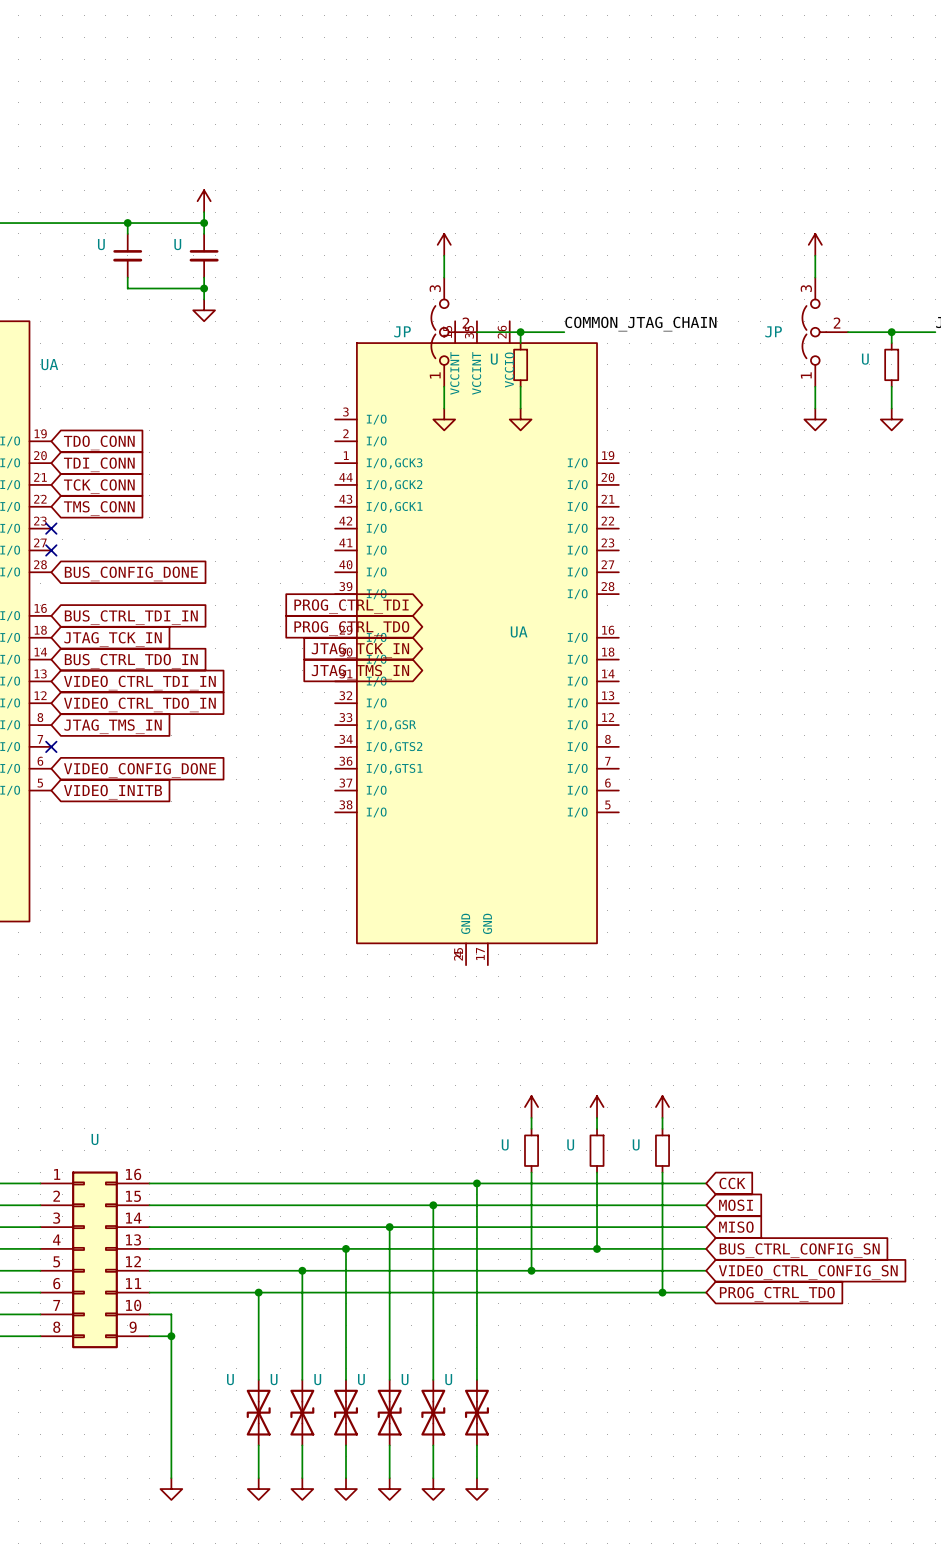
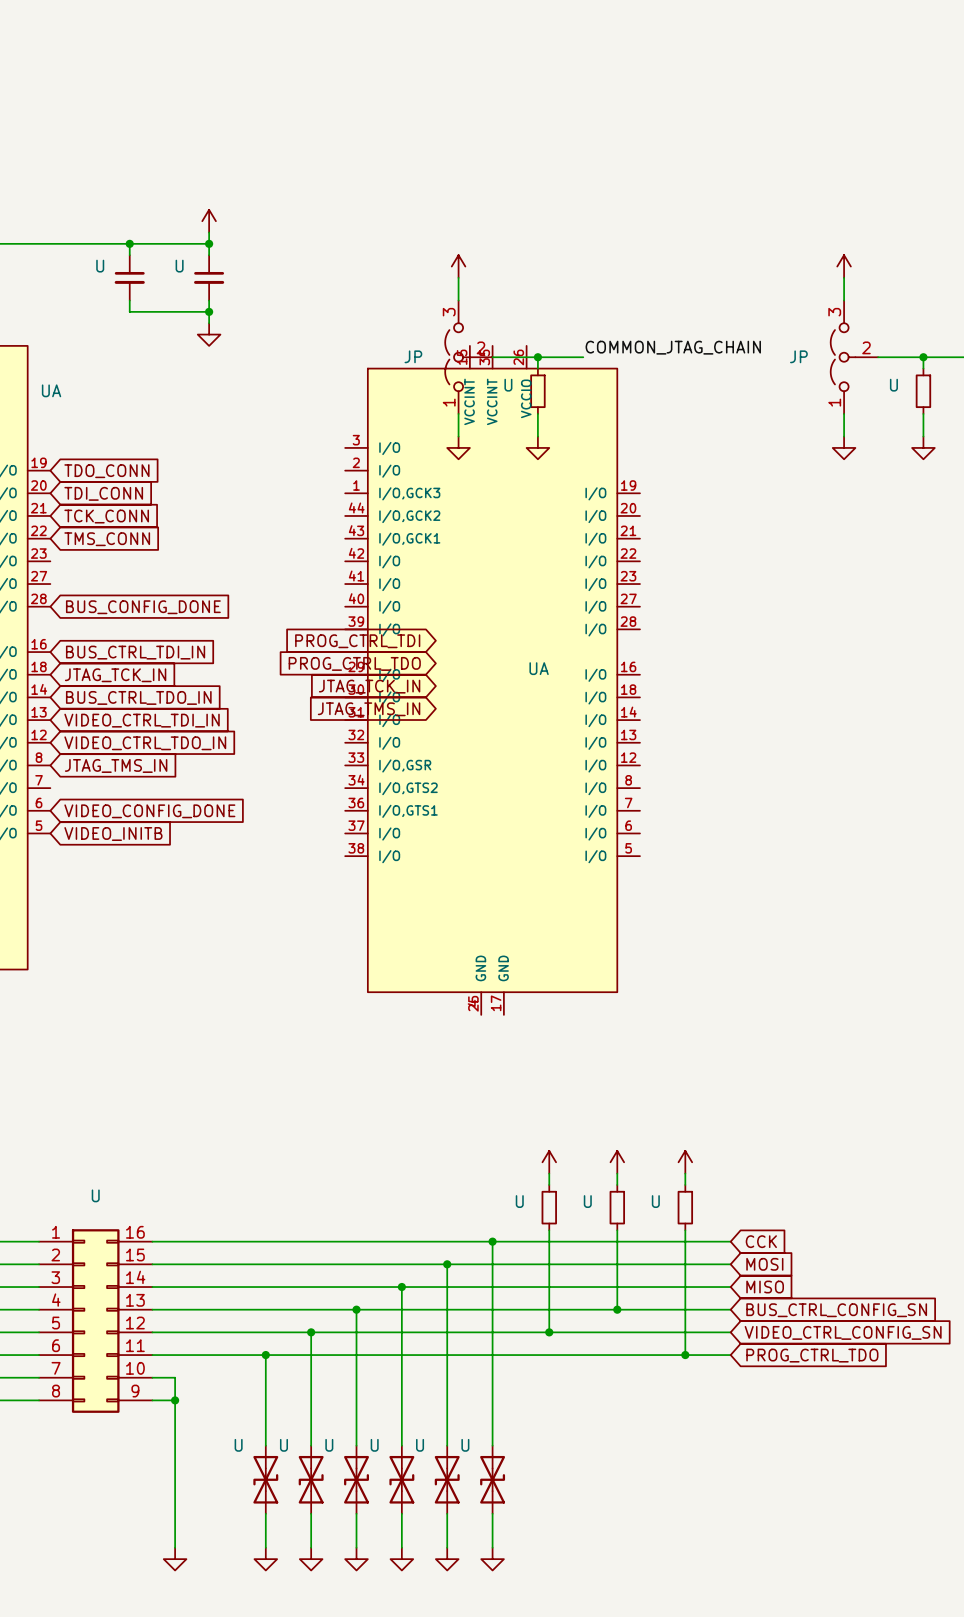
no-connect mark: (51, 528) -> none
no-connect mark: (51, 550) -> none
no-connect mark: (51, 746) -> none

